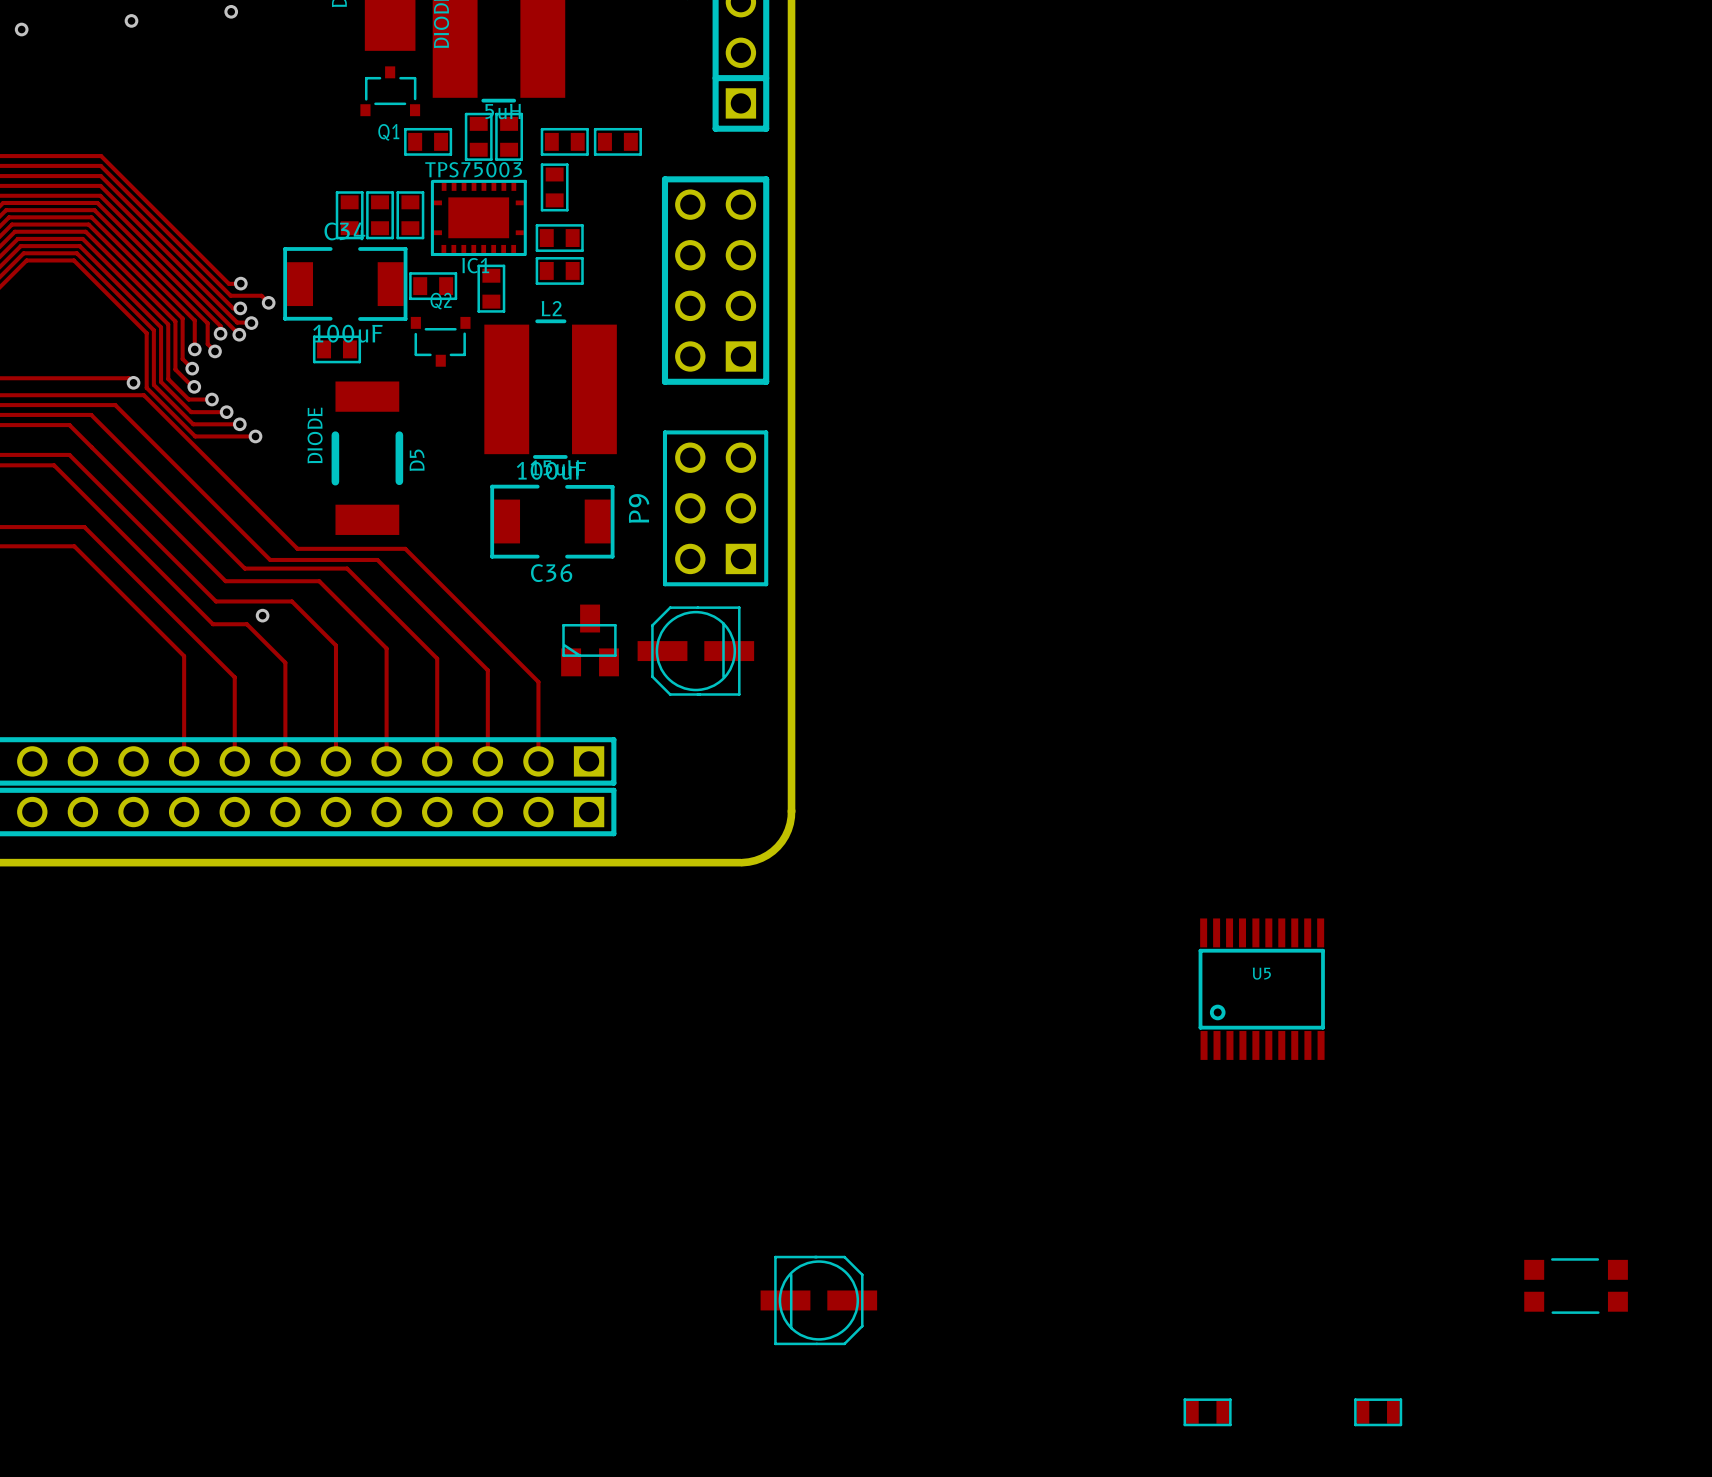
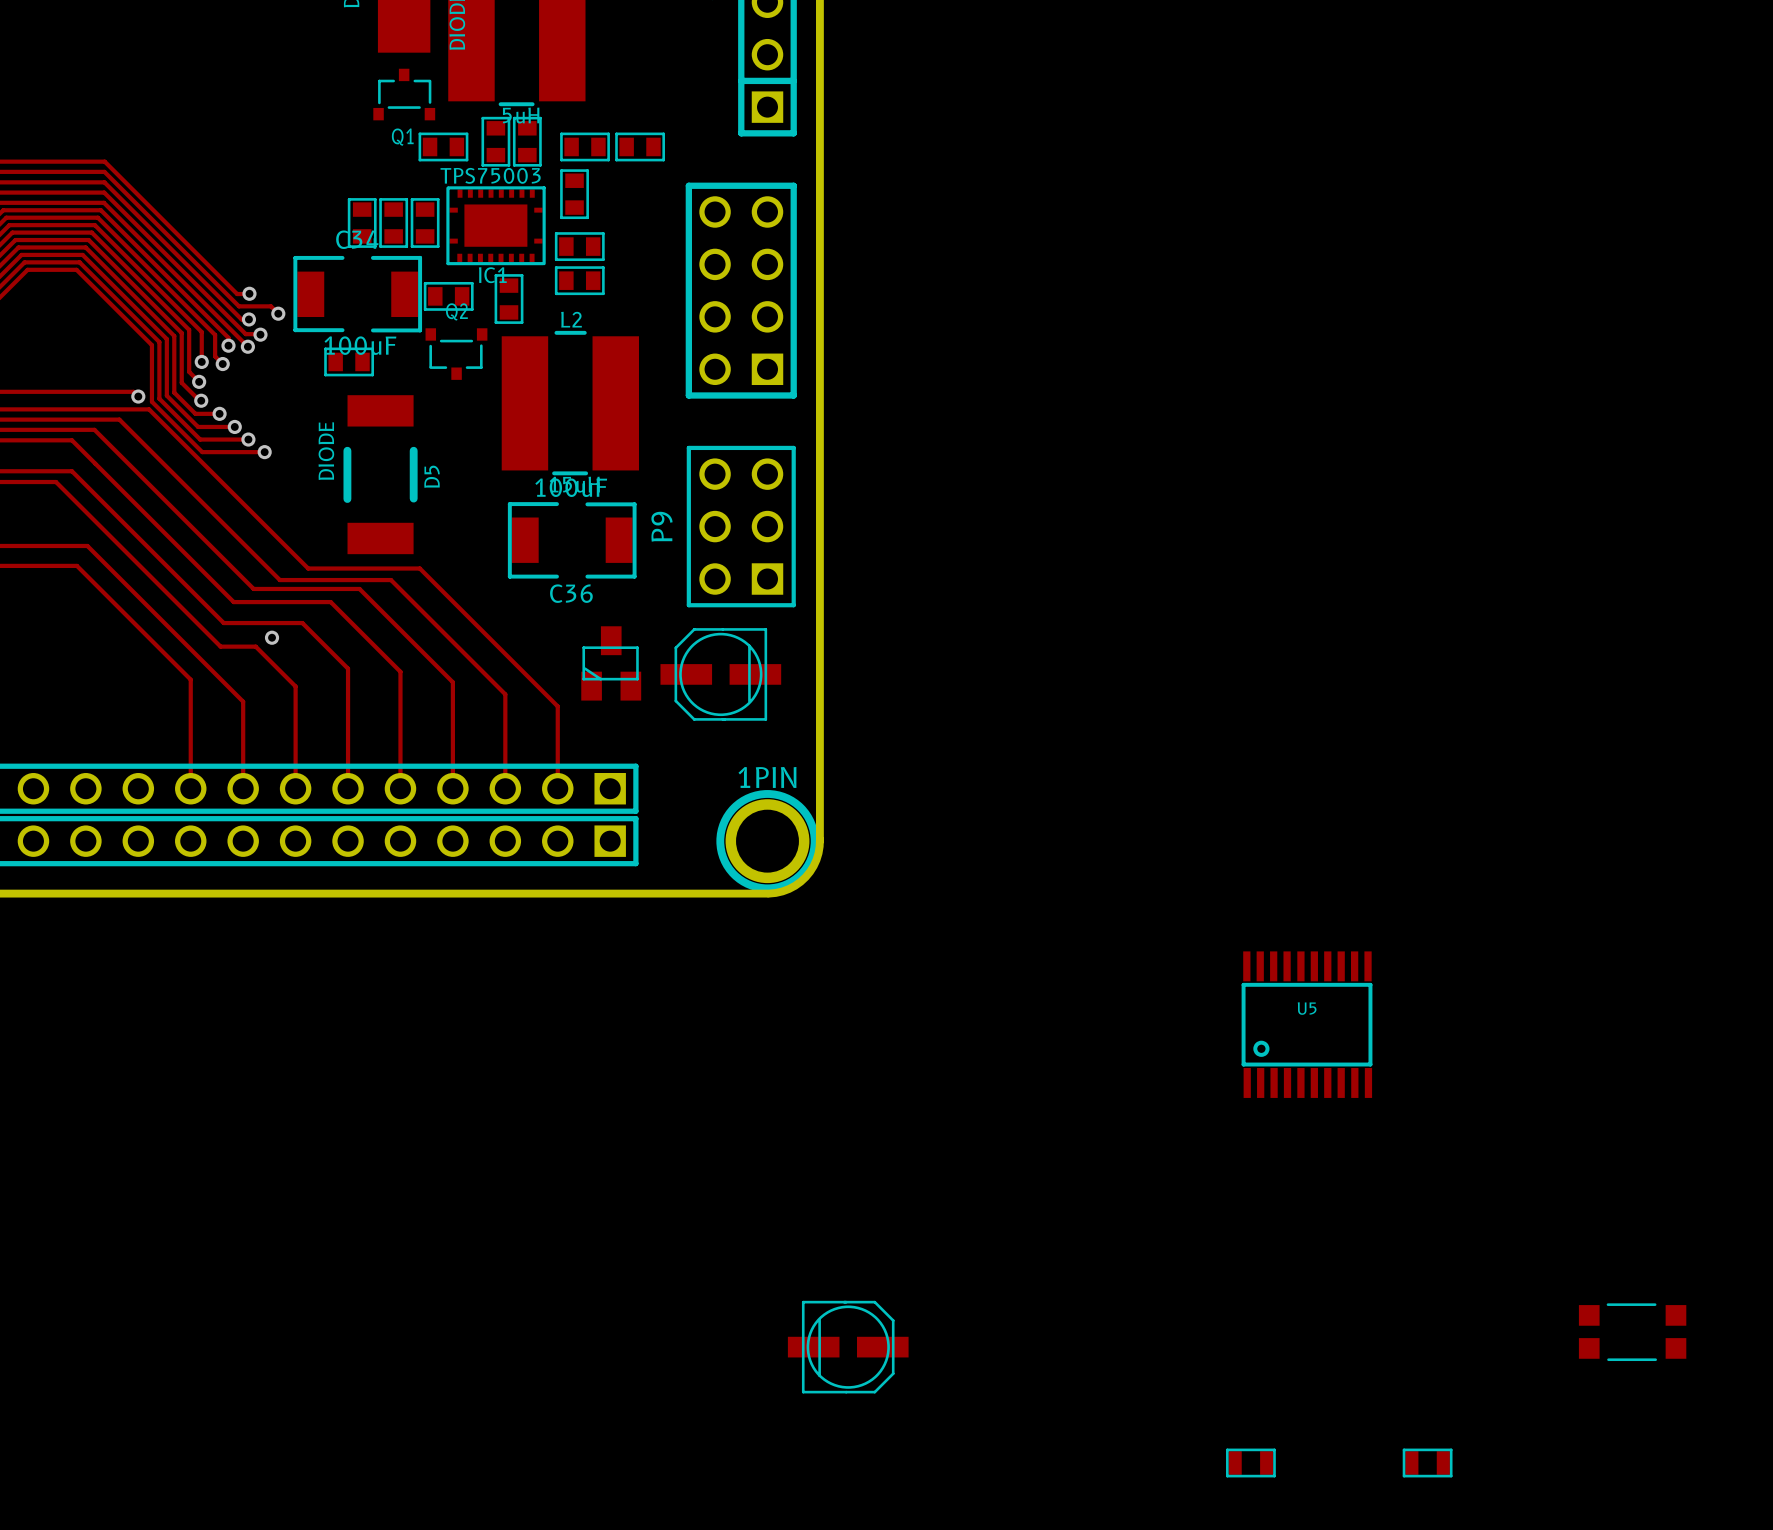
via: (231, 11) -> none
via: (131, 20) -> none
via: (21, 29) -> none
1PIN: none -> (767, 841)

